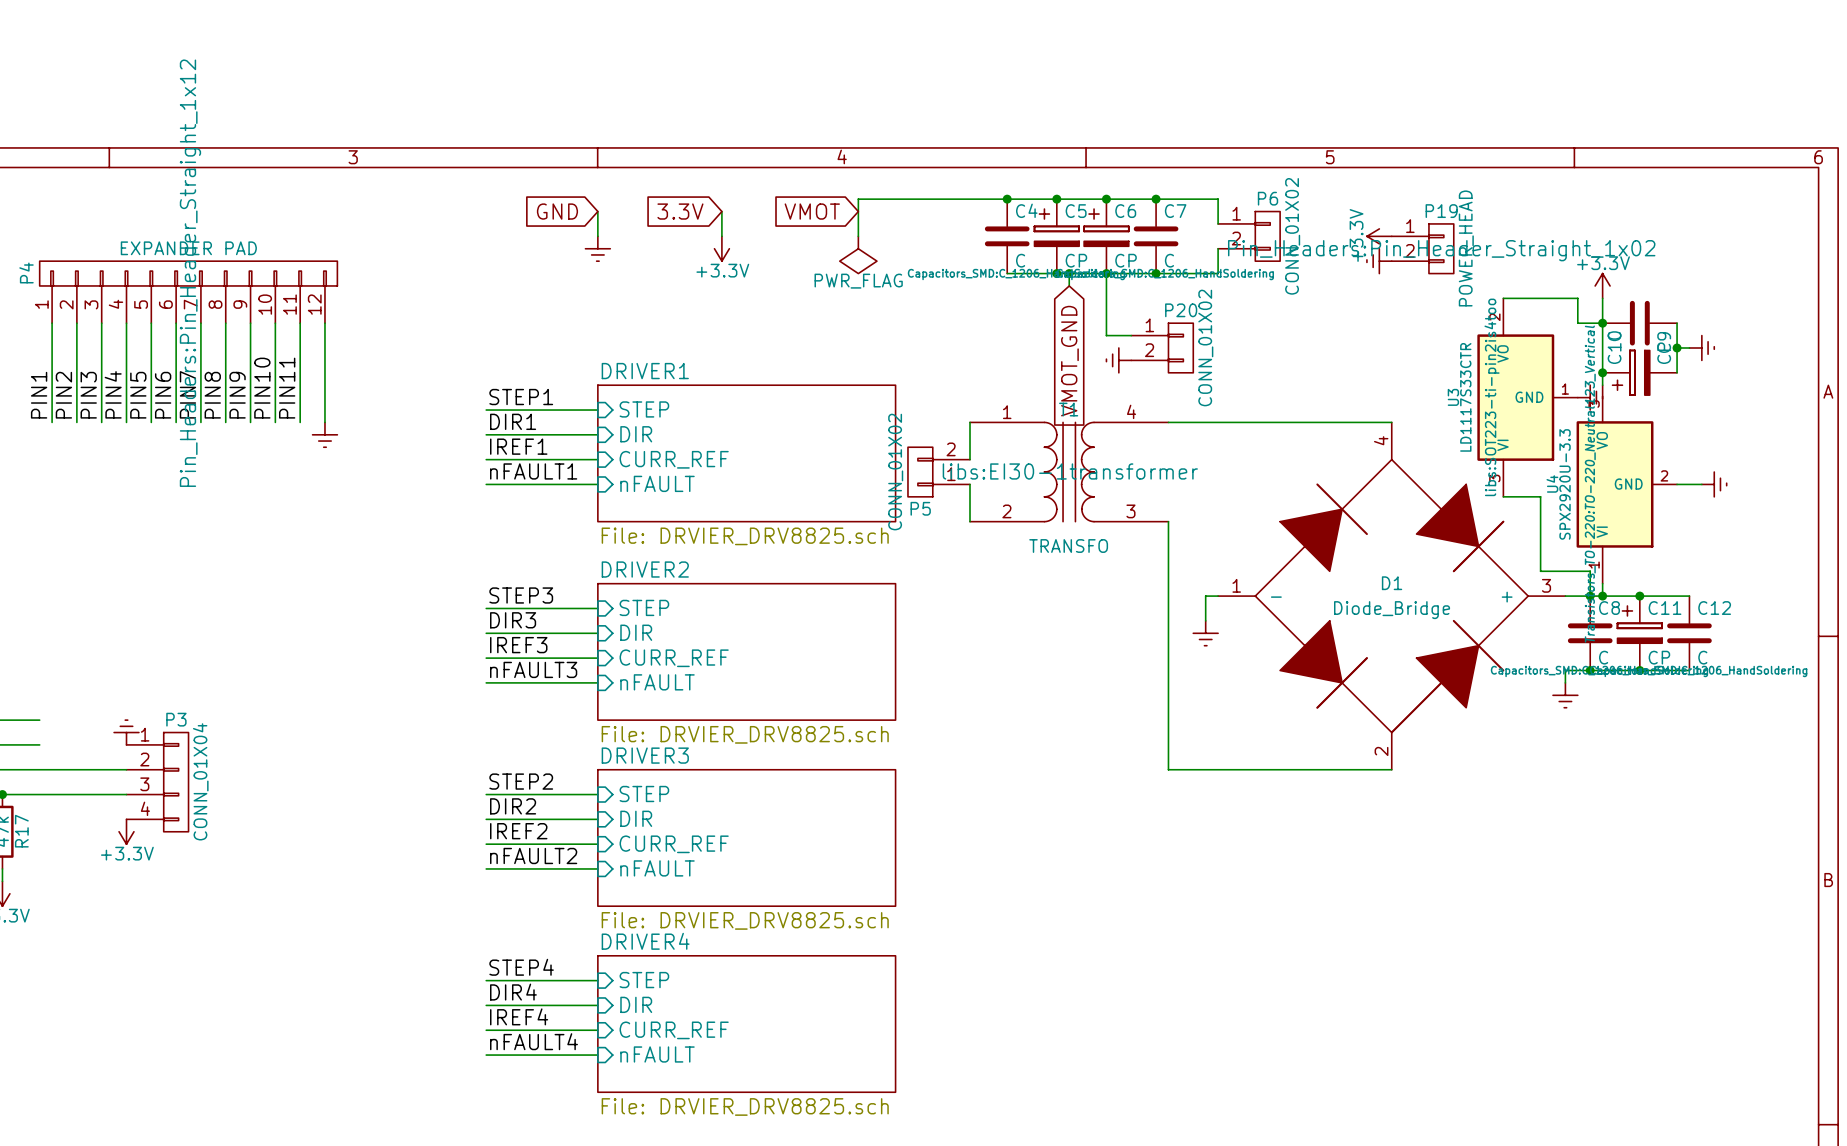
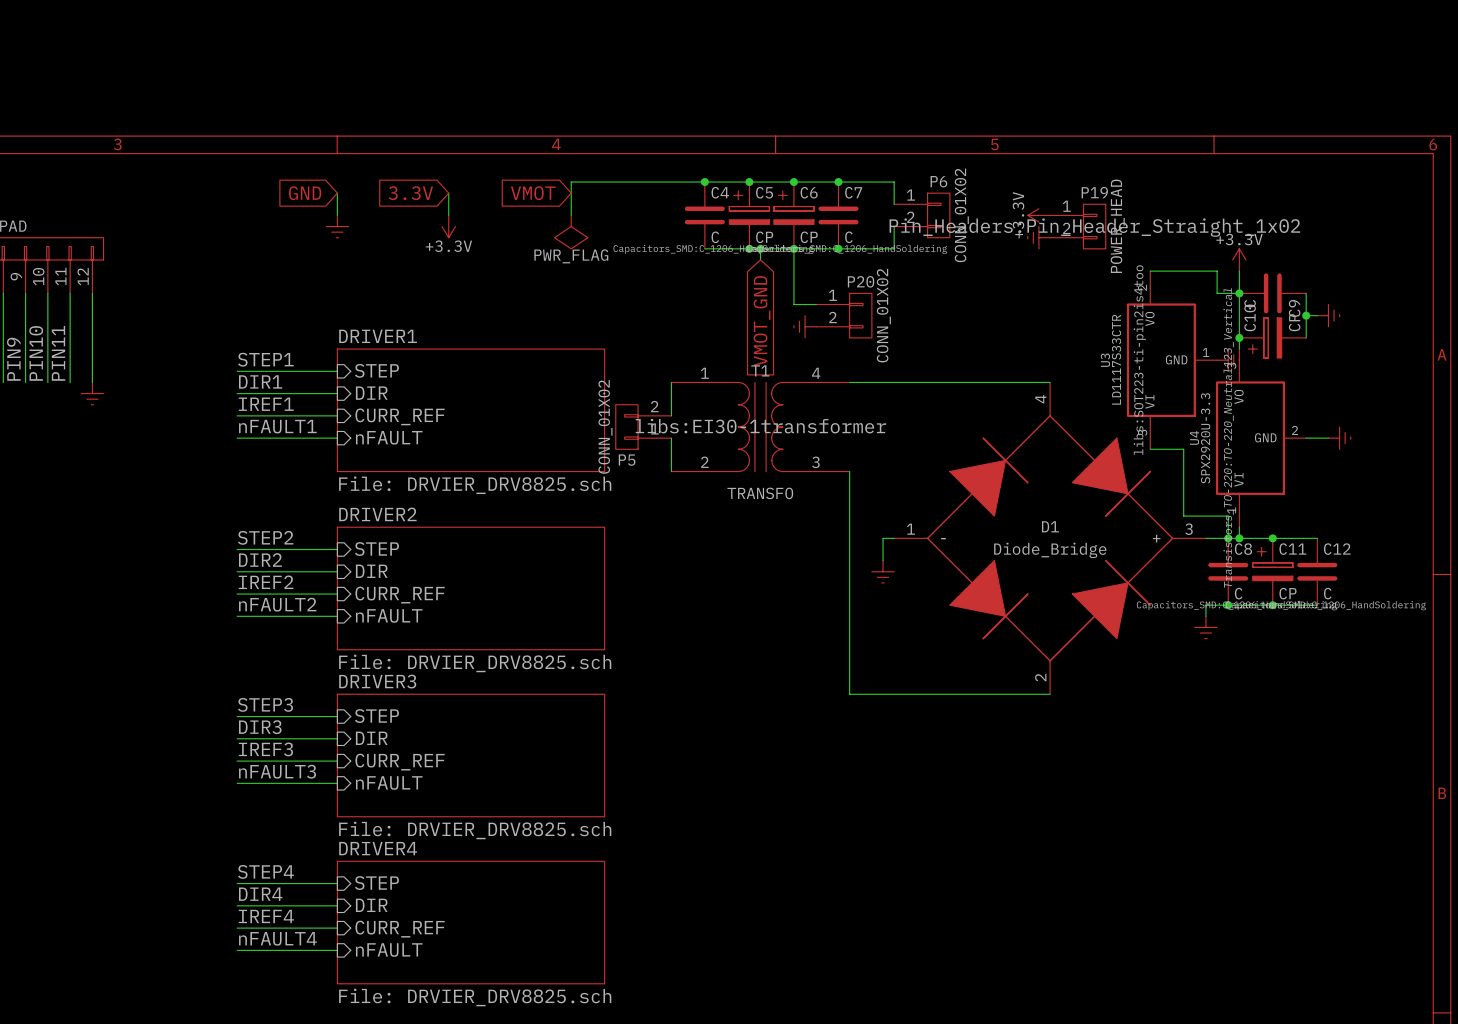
label: STEP3 (521, 595) -> STEP2 (265, 537)
label: DIR3 (513, 620) -> DIR2 (260, 560)
label: IREF3 (518, 645) -> IREF2 (266, 582)
label: nFAULT3 (533, 669) -> nFAULT2 (277, 604)
label: STEP2 (521, 781) -> STEP3 (265, 704)
label: DIR2 (513, 806) -> DIR3 (260, 727)
label: IREF2 (518, 831) -> IREF3 (265, 749)
label: nFAULT2 (533, 855) -> nFAULT3 (277, 771)

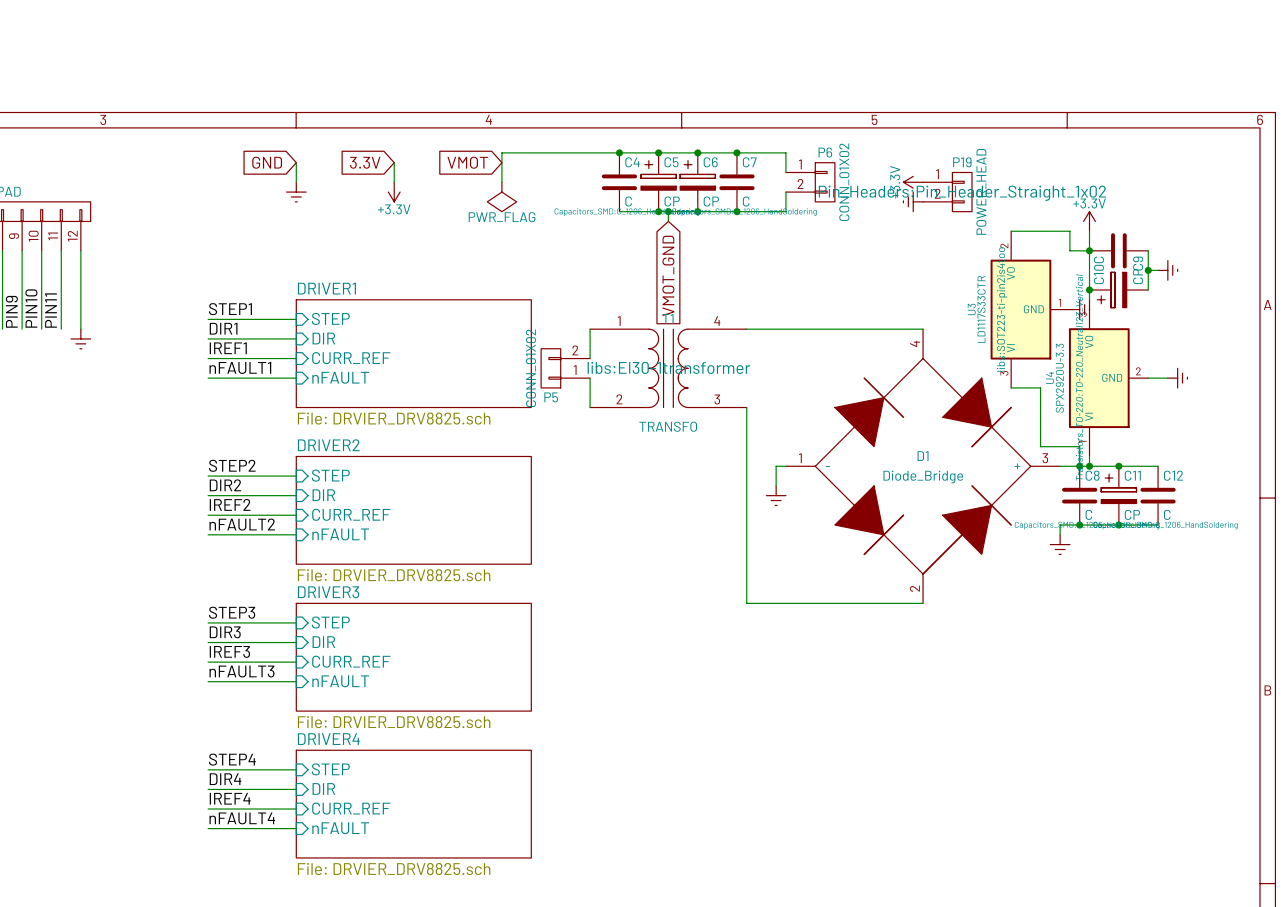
wire: (793, 248) (793, 304) (816, 304) -> none
P20: CONN_01X02 (844, 315) -> none
power symbol: (805, 326) -> none

